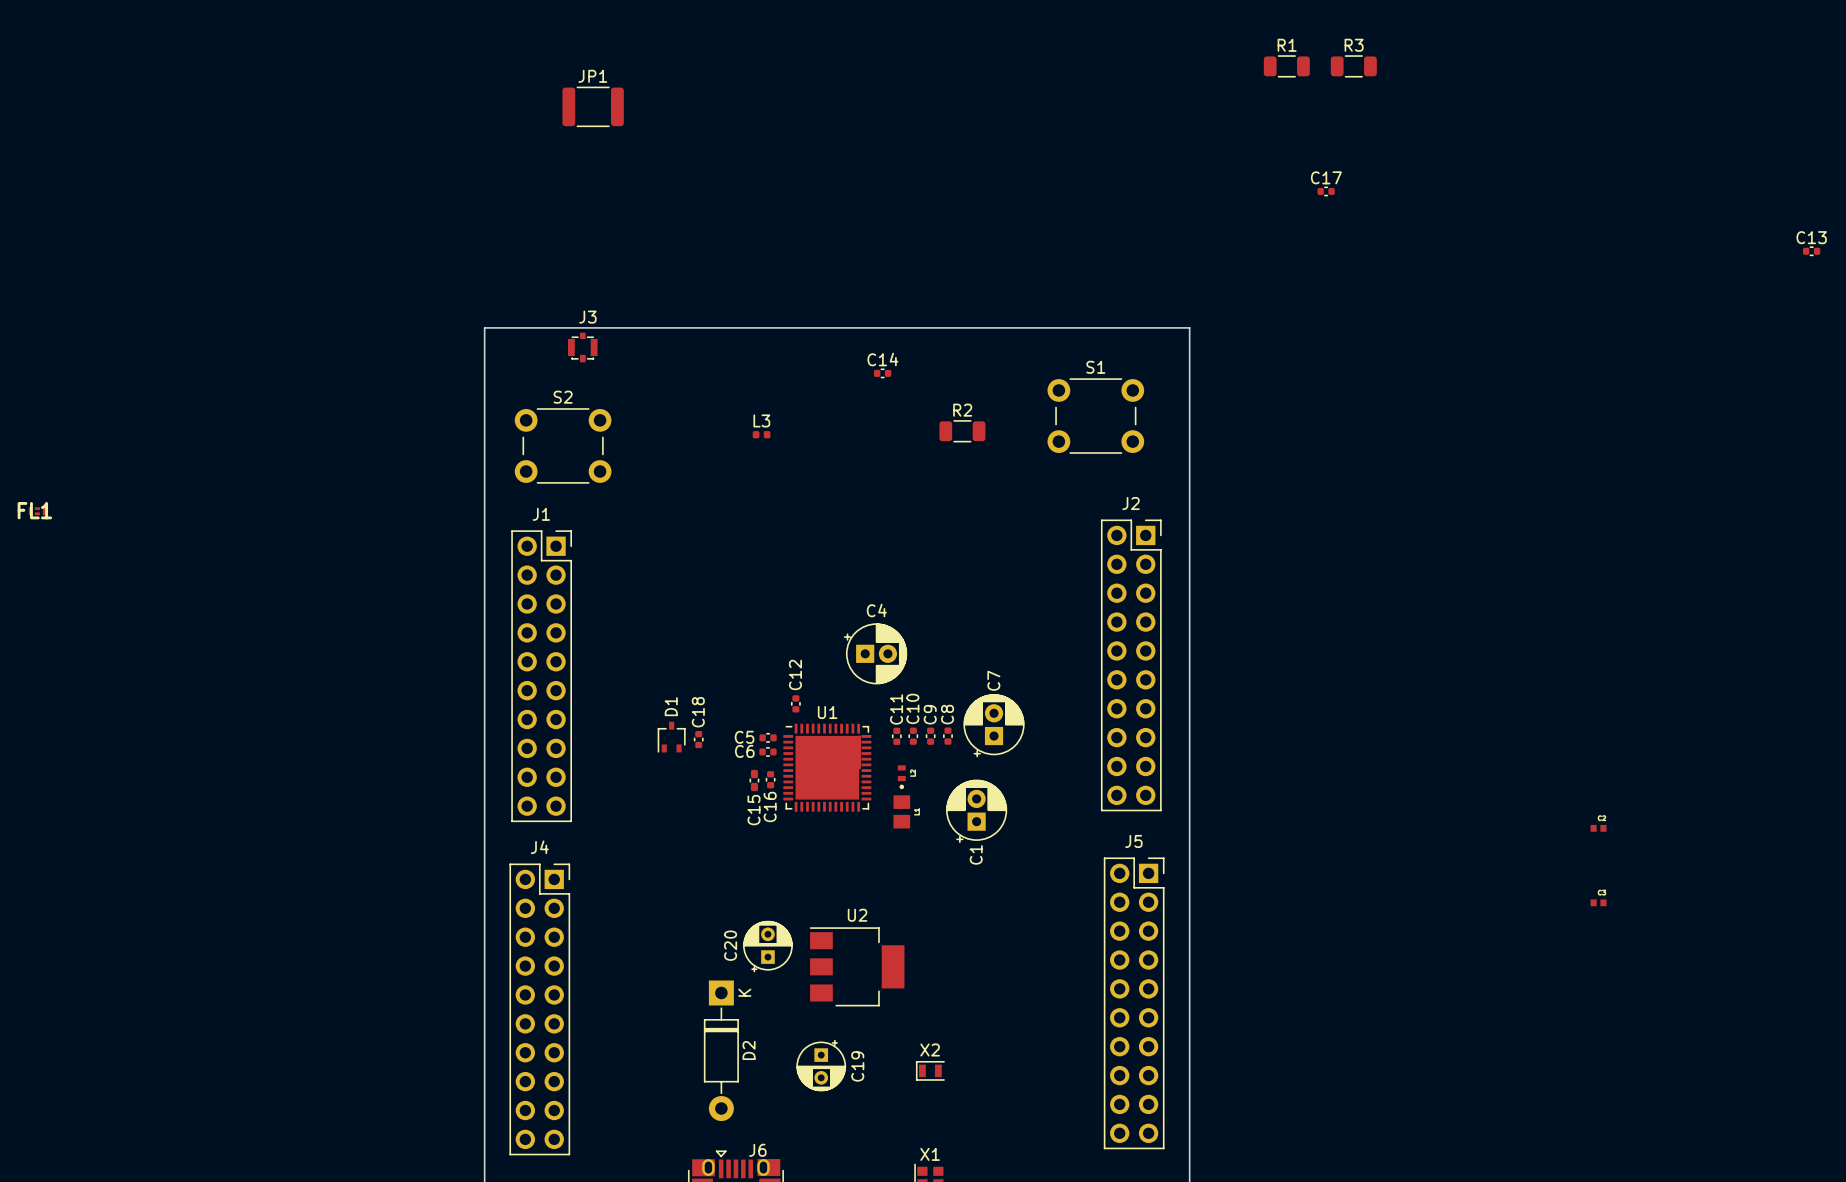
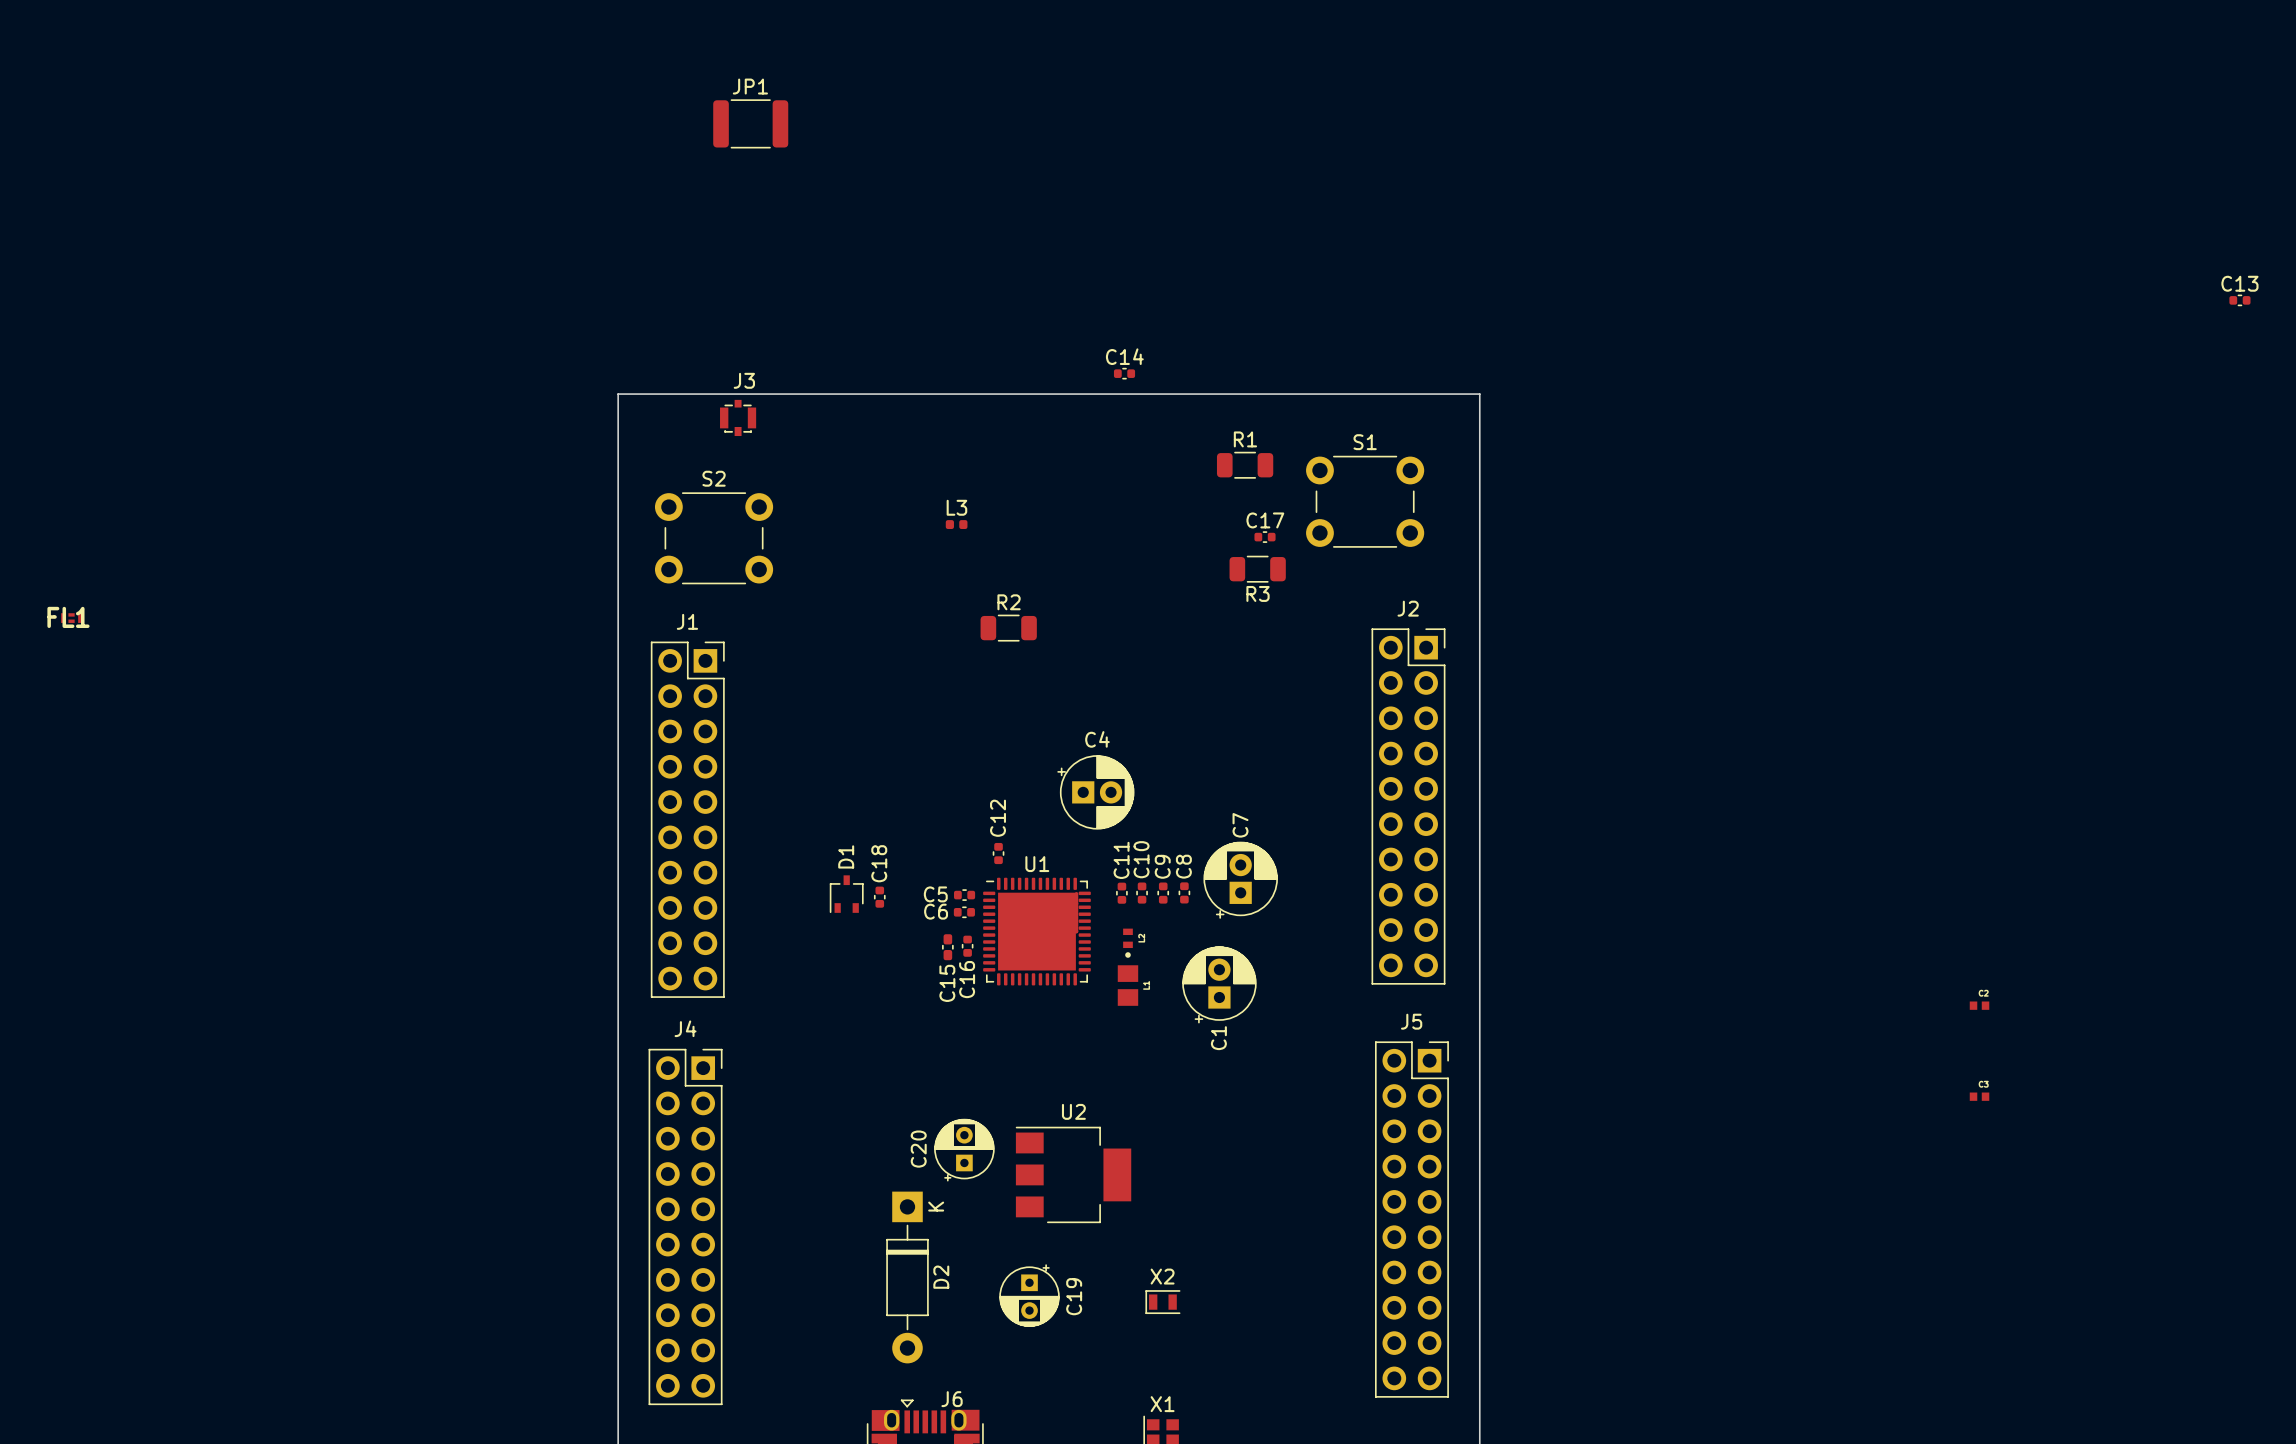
R3 name position: R3 (1354, 45) -> R3 (1258, 593)
R1 position: (1286, 66) -> (1245, 465)
R3 position: (1353, 66) -> (1257, 569)
C17 position: (1326, 191) -> (1265, 537)
C14 position: (882, 373) -> (1124, 373)
R2 position: (962, 431) -> (1008, 628)

